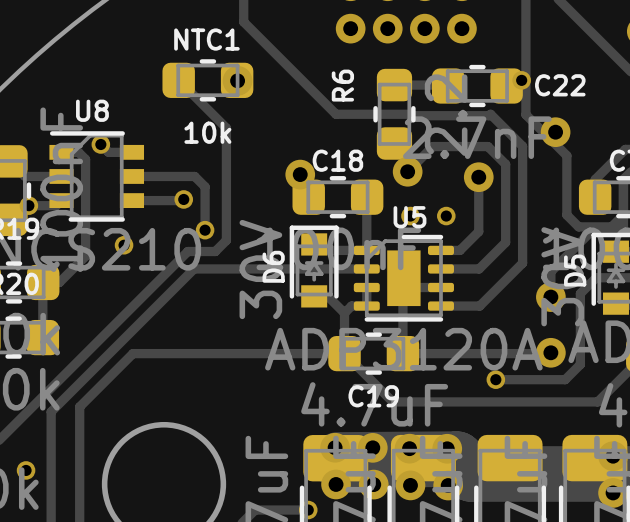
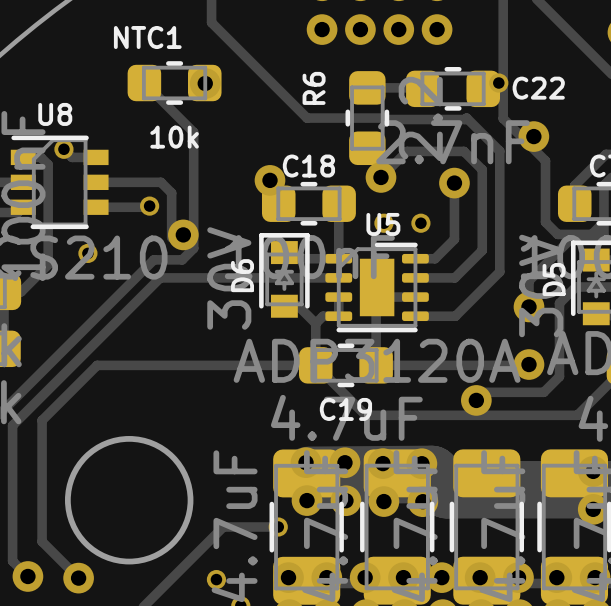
NTC1 name position: NTC1 (206, 39) -> NTC1 (147, 37)
via size: [195, 220, 215, 240] -> [168, 219, 199, 251]
via size: [486, 370, 506, 389] -> [461, 385, 492, 416]

